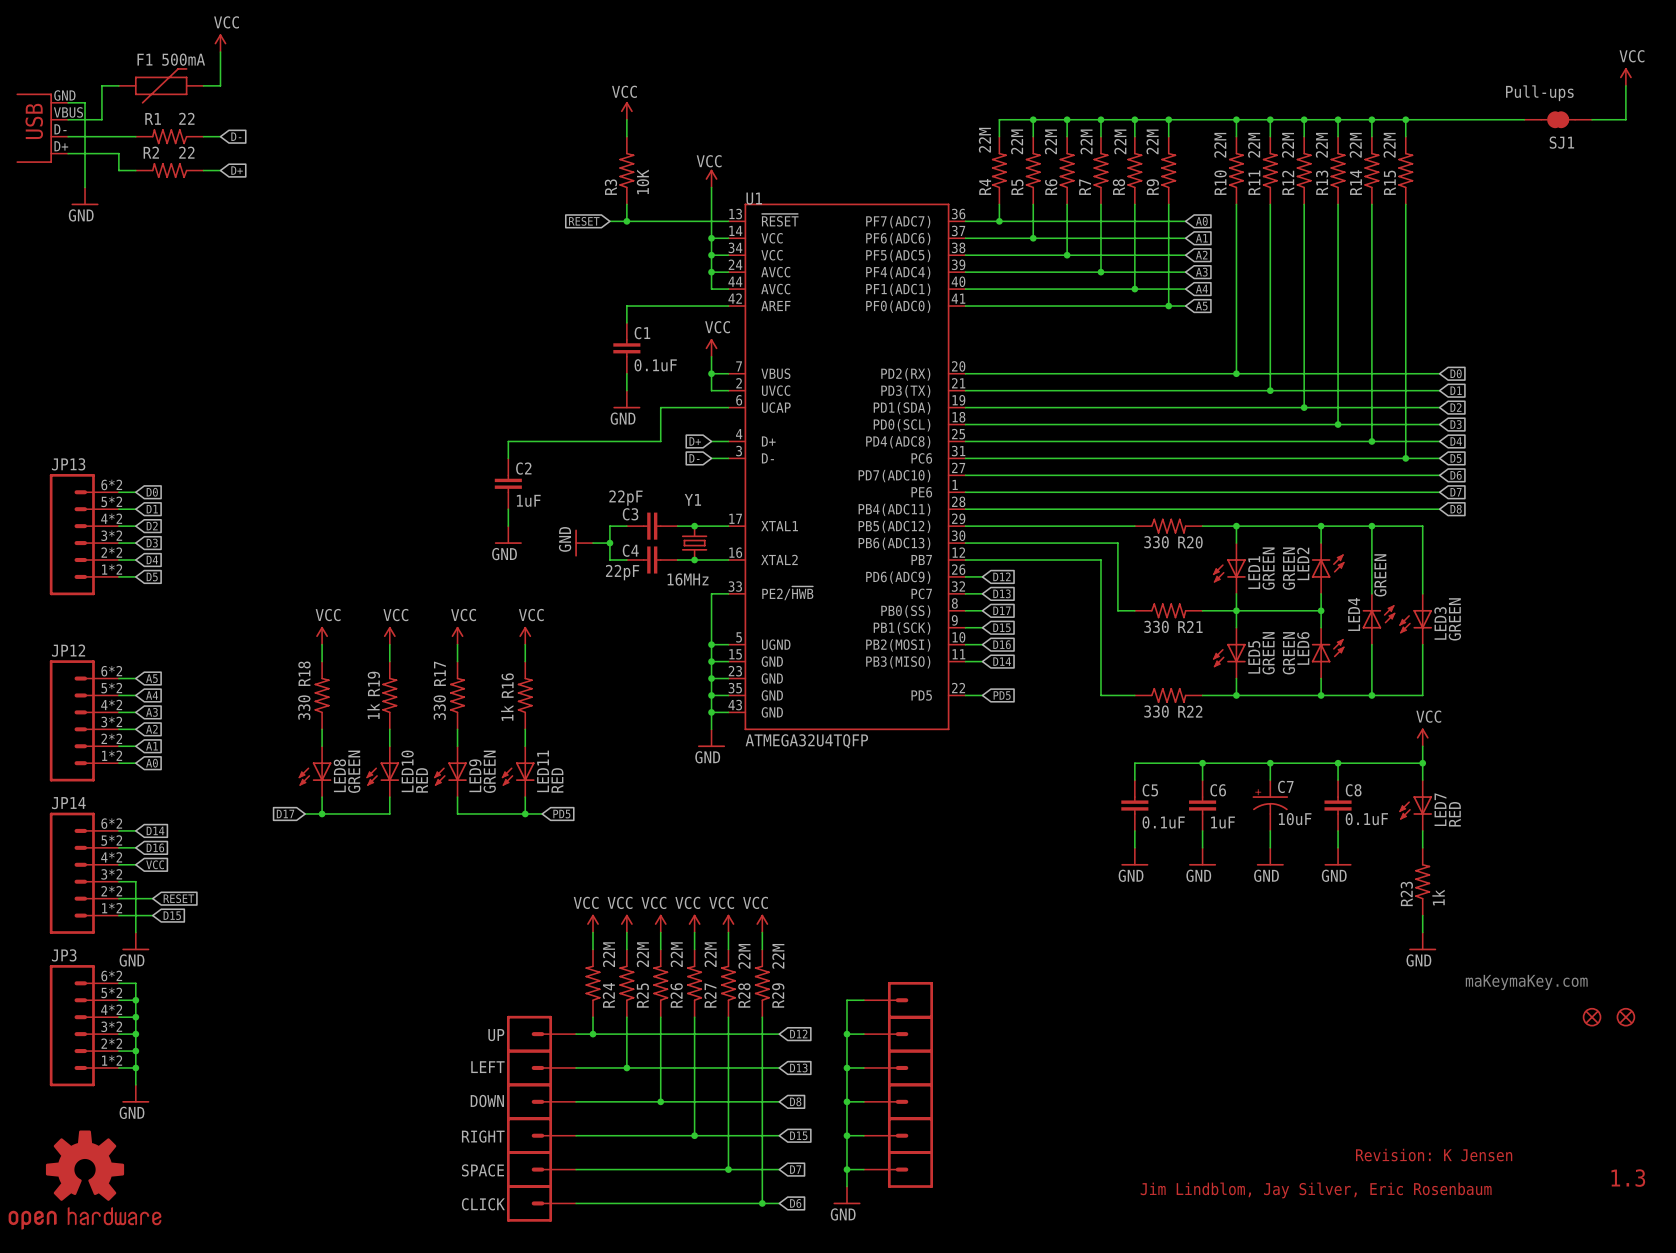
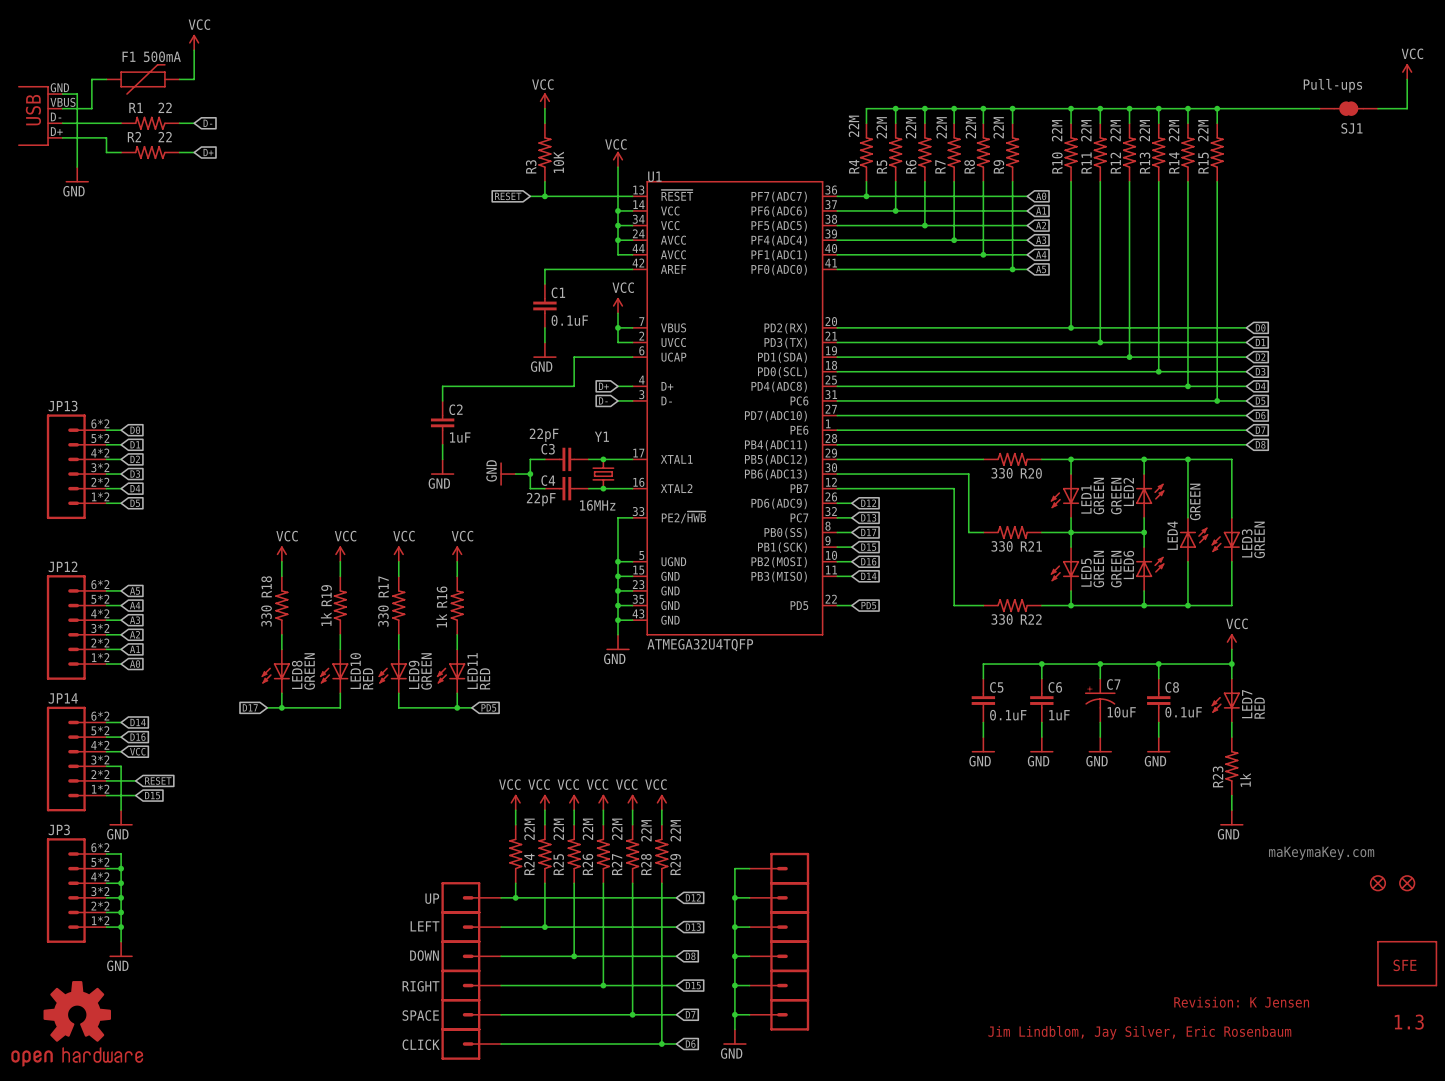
part: none -> (1407, 963)

